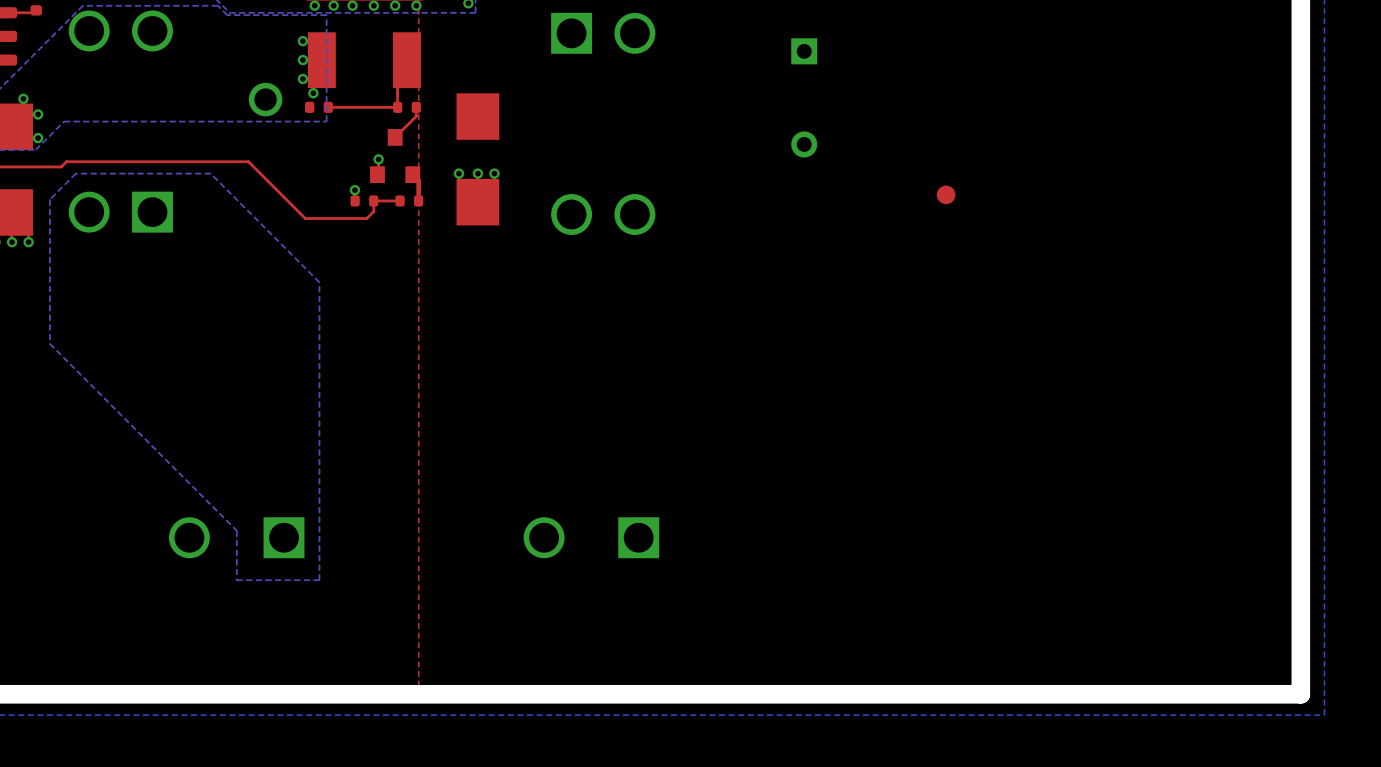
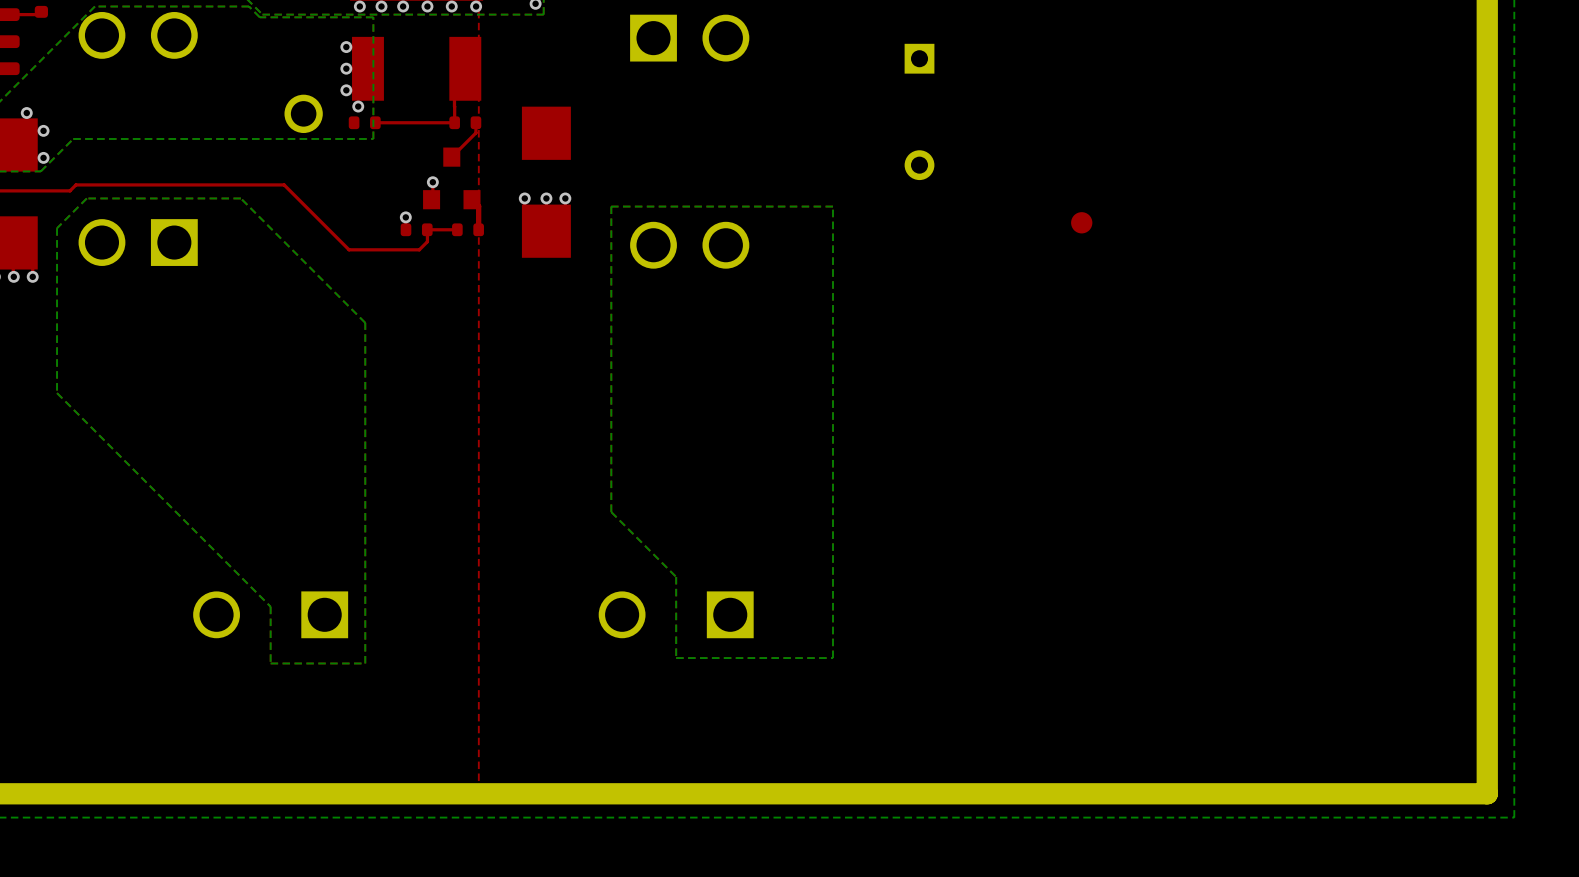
bottom zone outline: none -> (832, 206) (832, 658) (676, 658) (676, 576) (611, 512) (611, 206) (832, 206)

